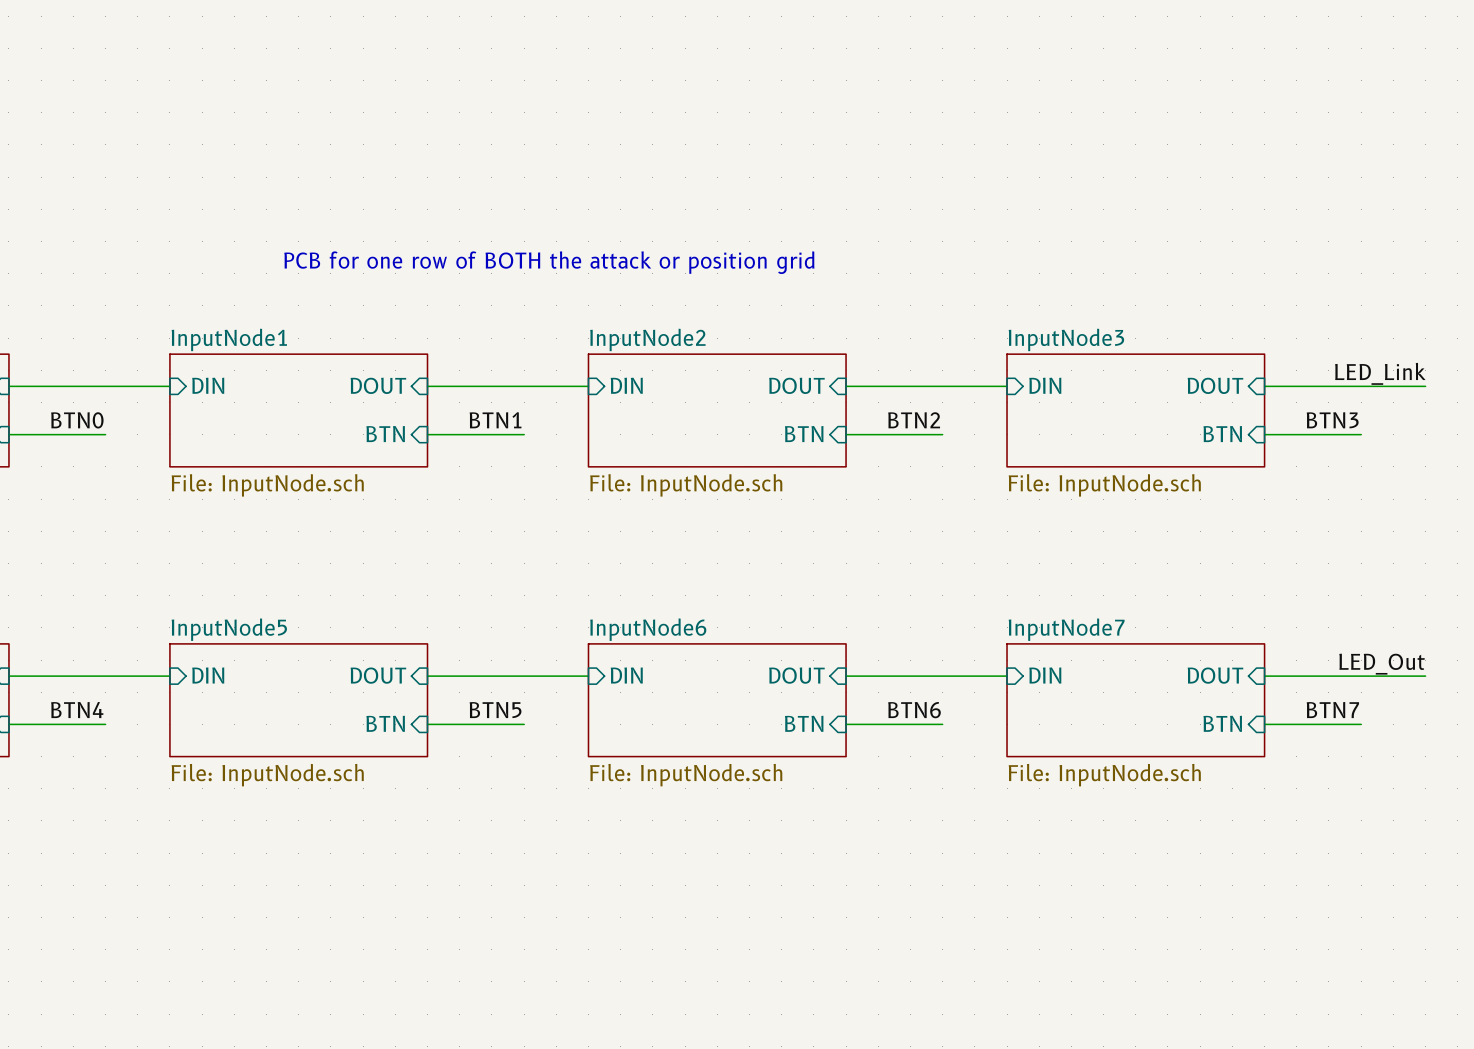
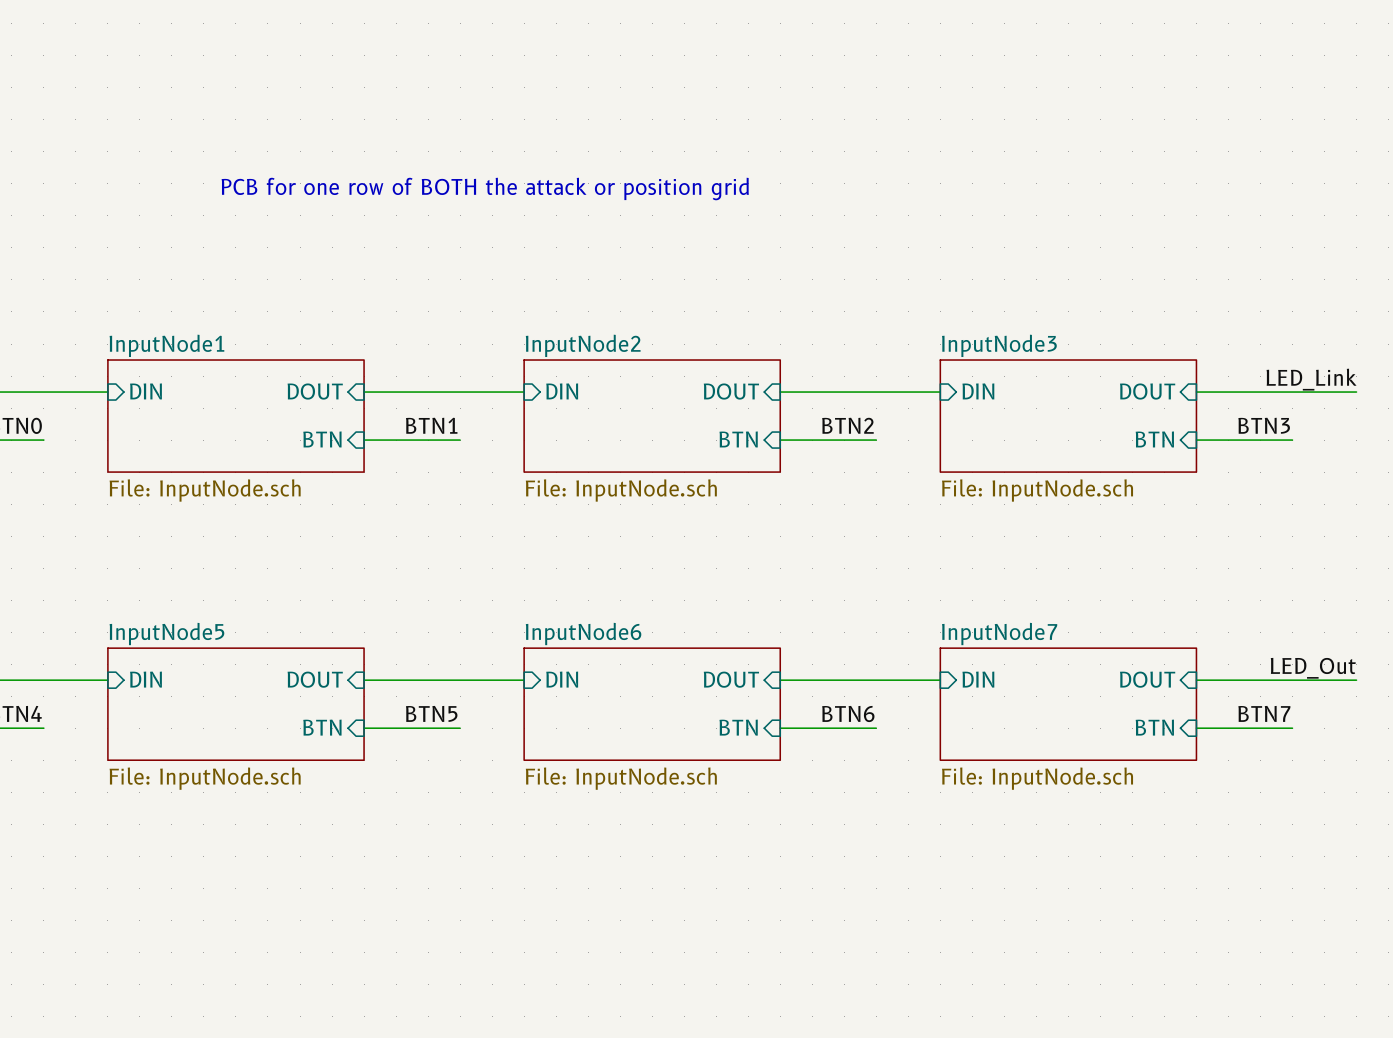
text position: PCB for one row of BOTH the attack or position grid (549, 262) -> PCB for one row of BOTH the attack or position grid (485, 189)

